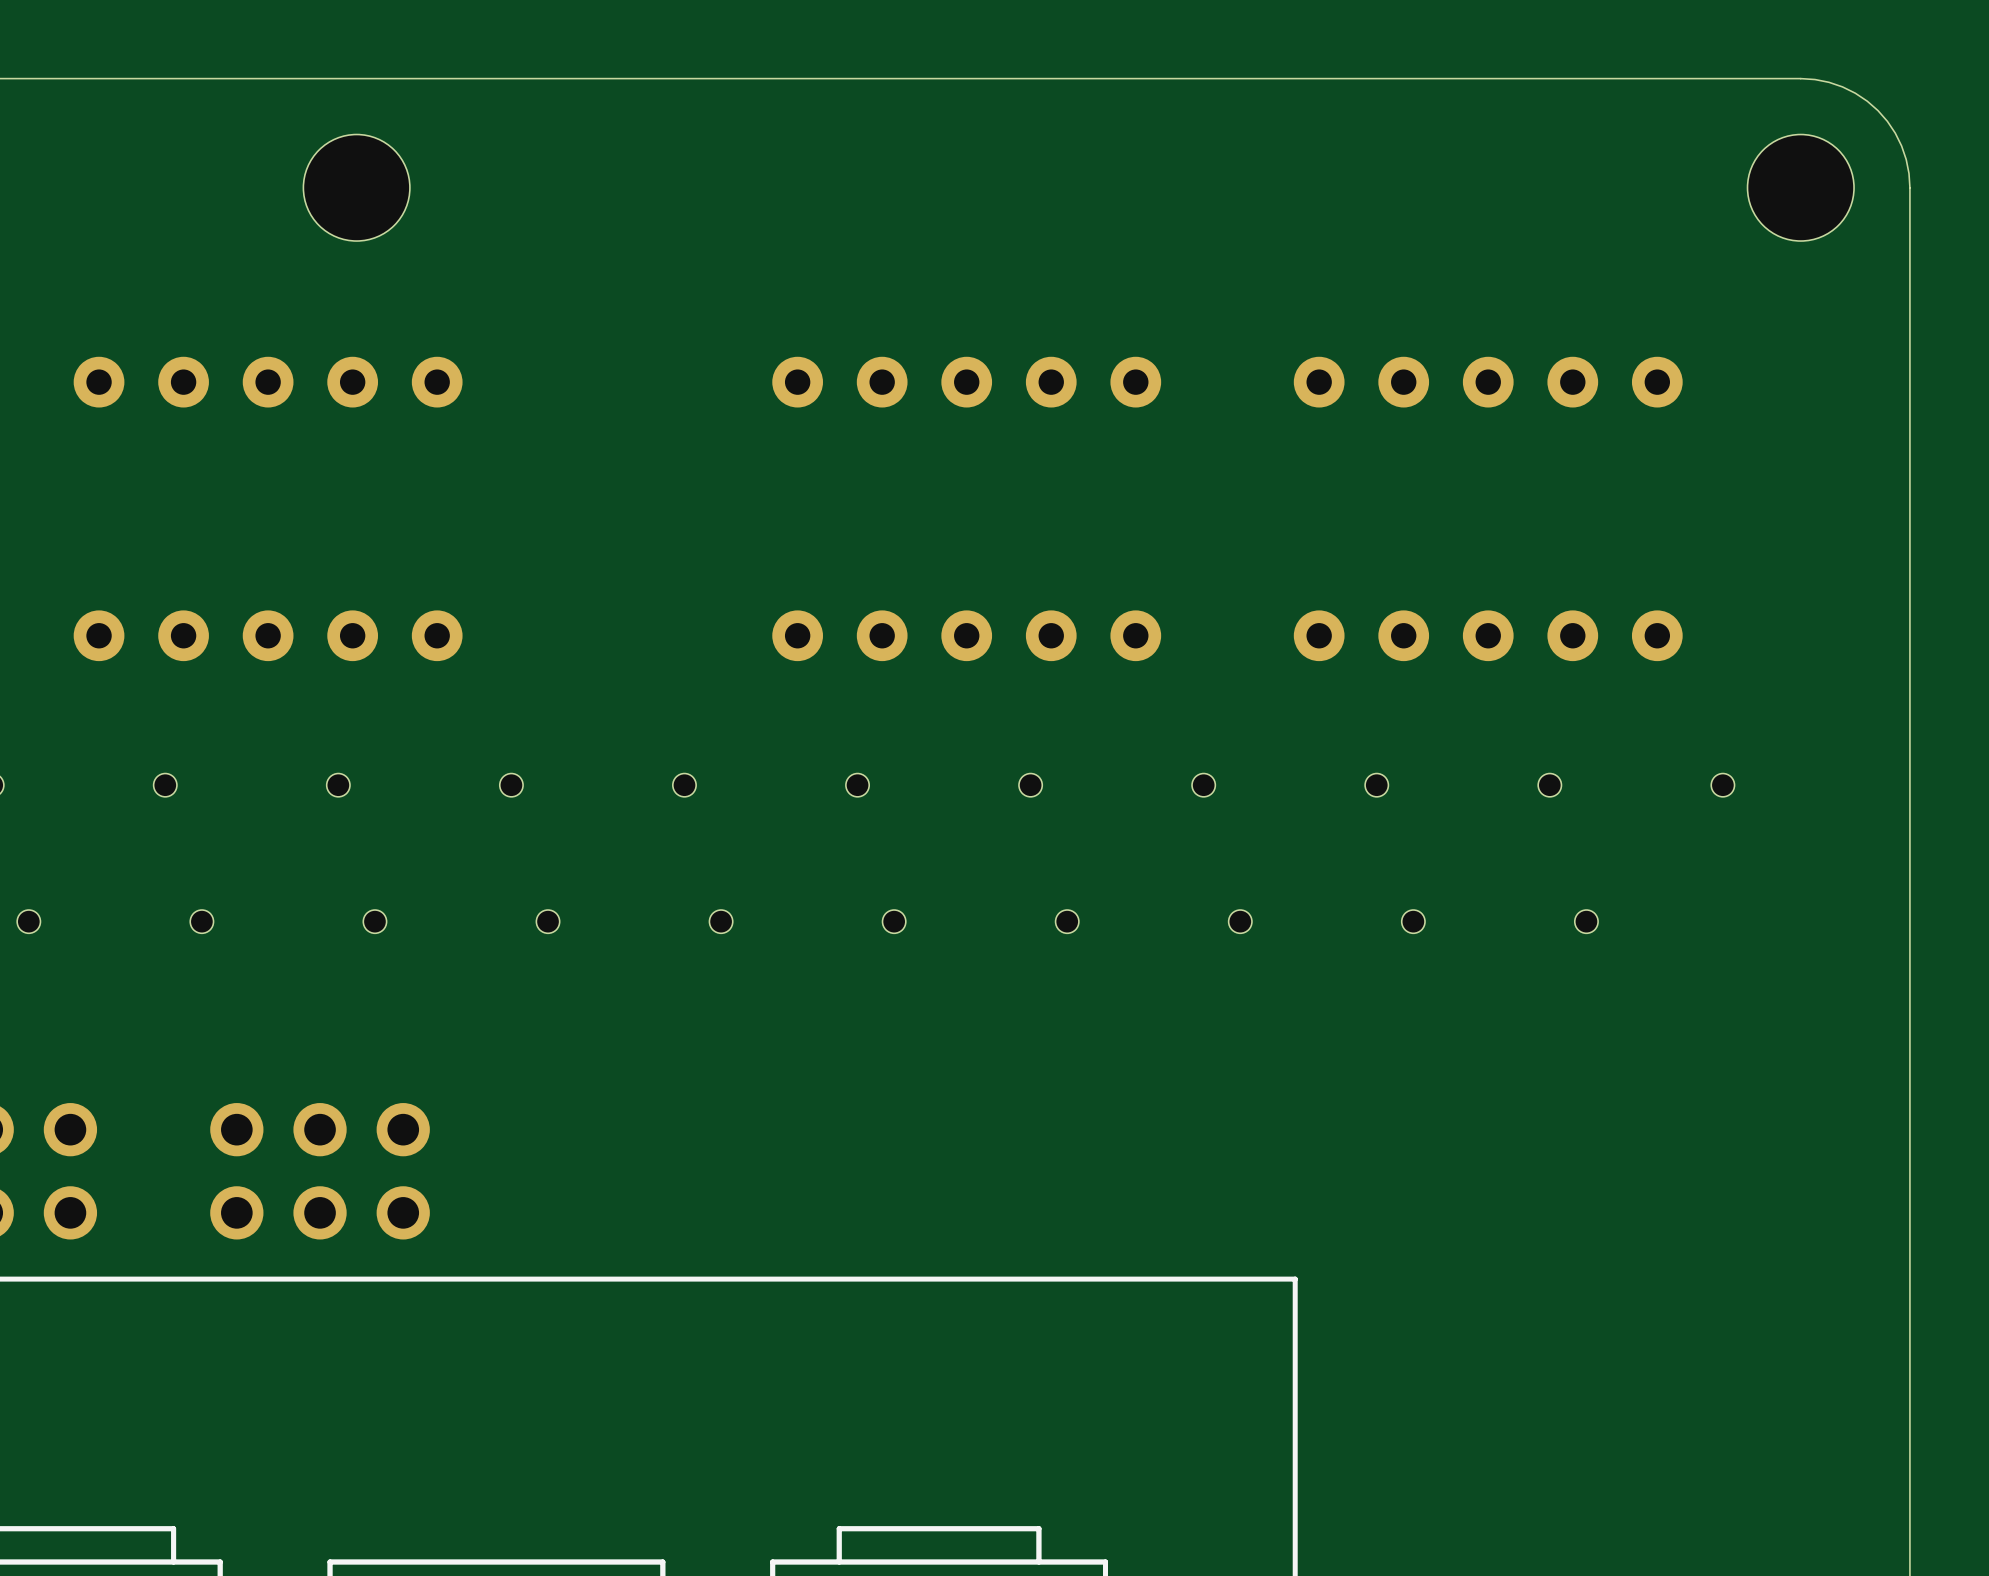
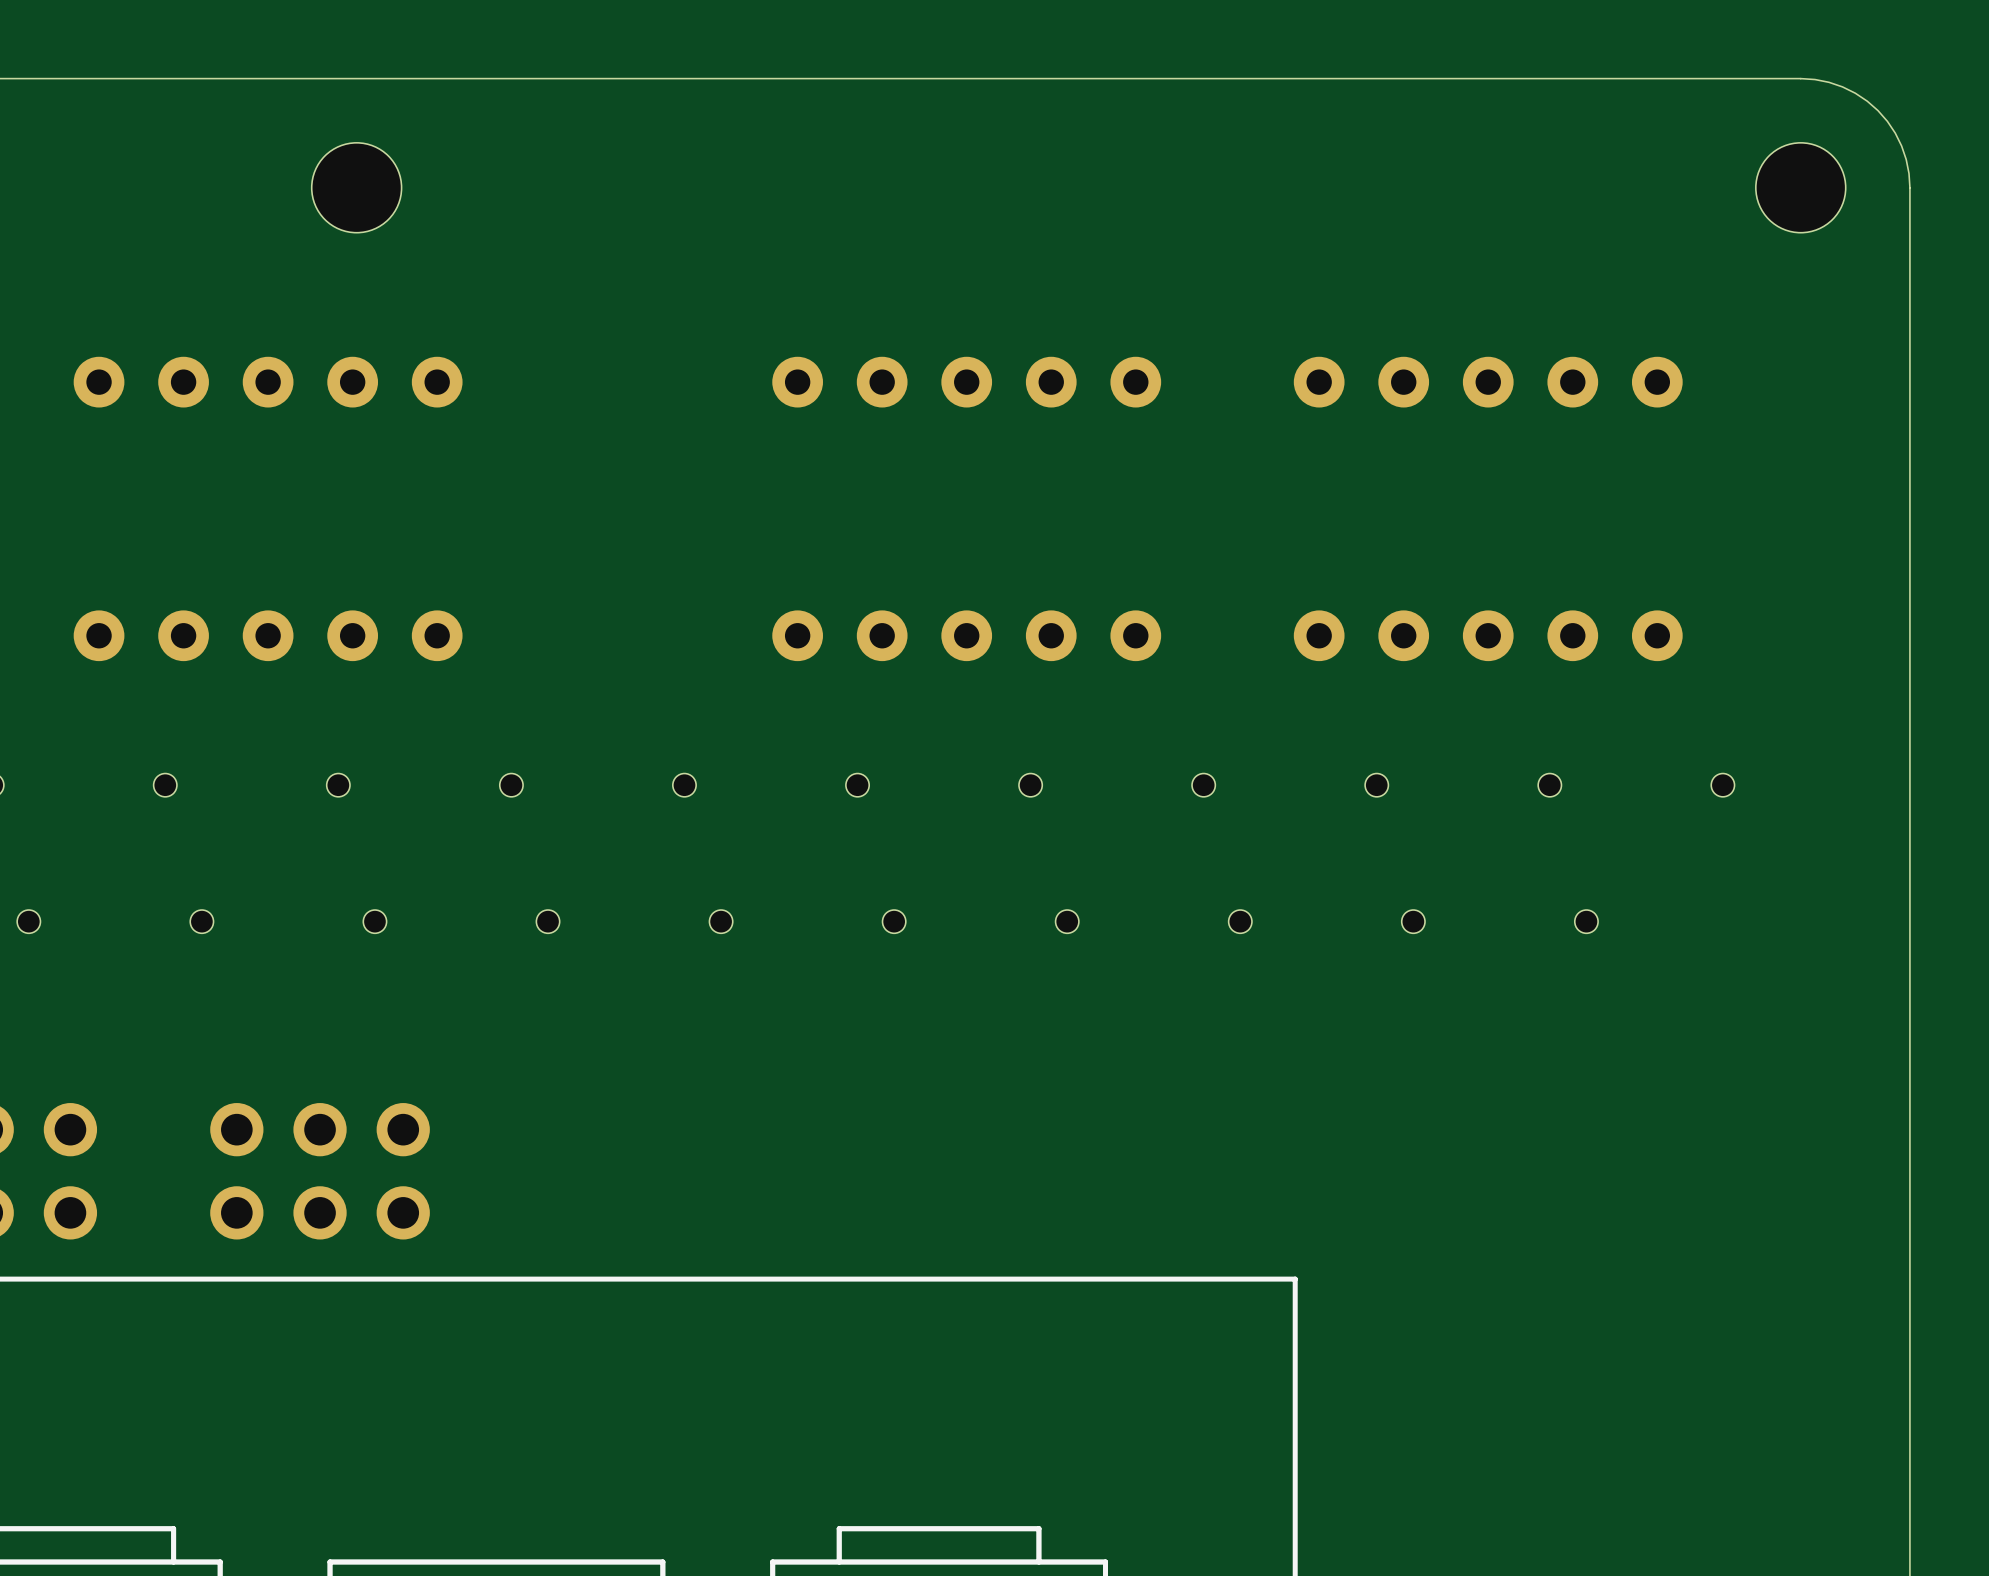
part footprint: [303, 134, 410, 242] -> [311, 142, 402, 233]
part footprint: [1747, 134, 1855, 242] -> [1755, 142, 1846, 233]

